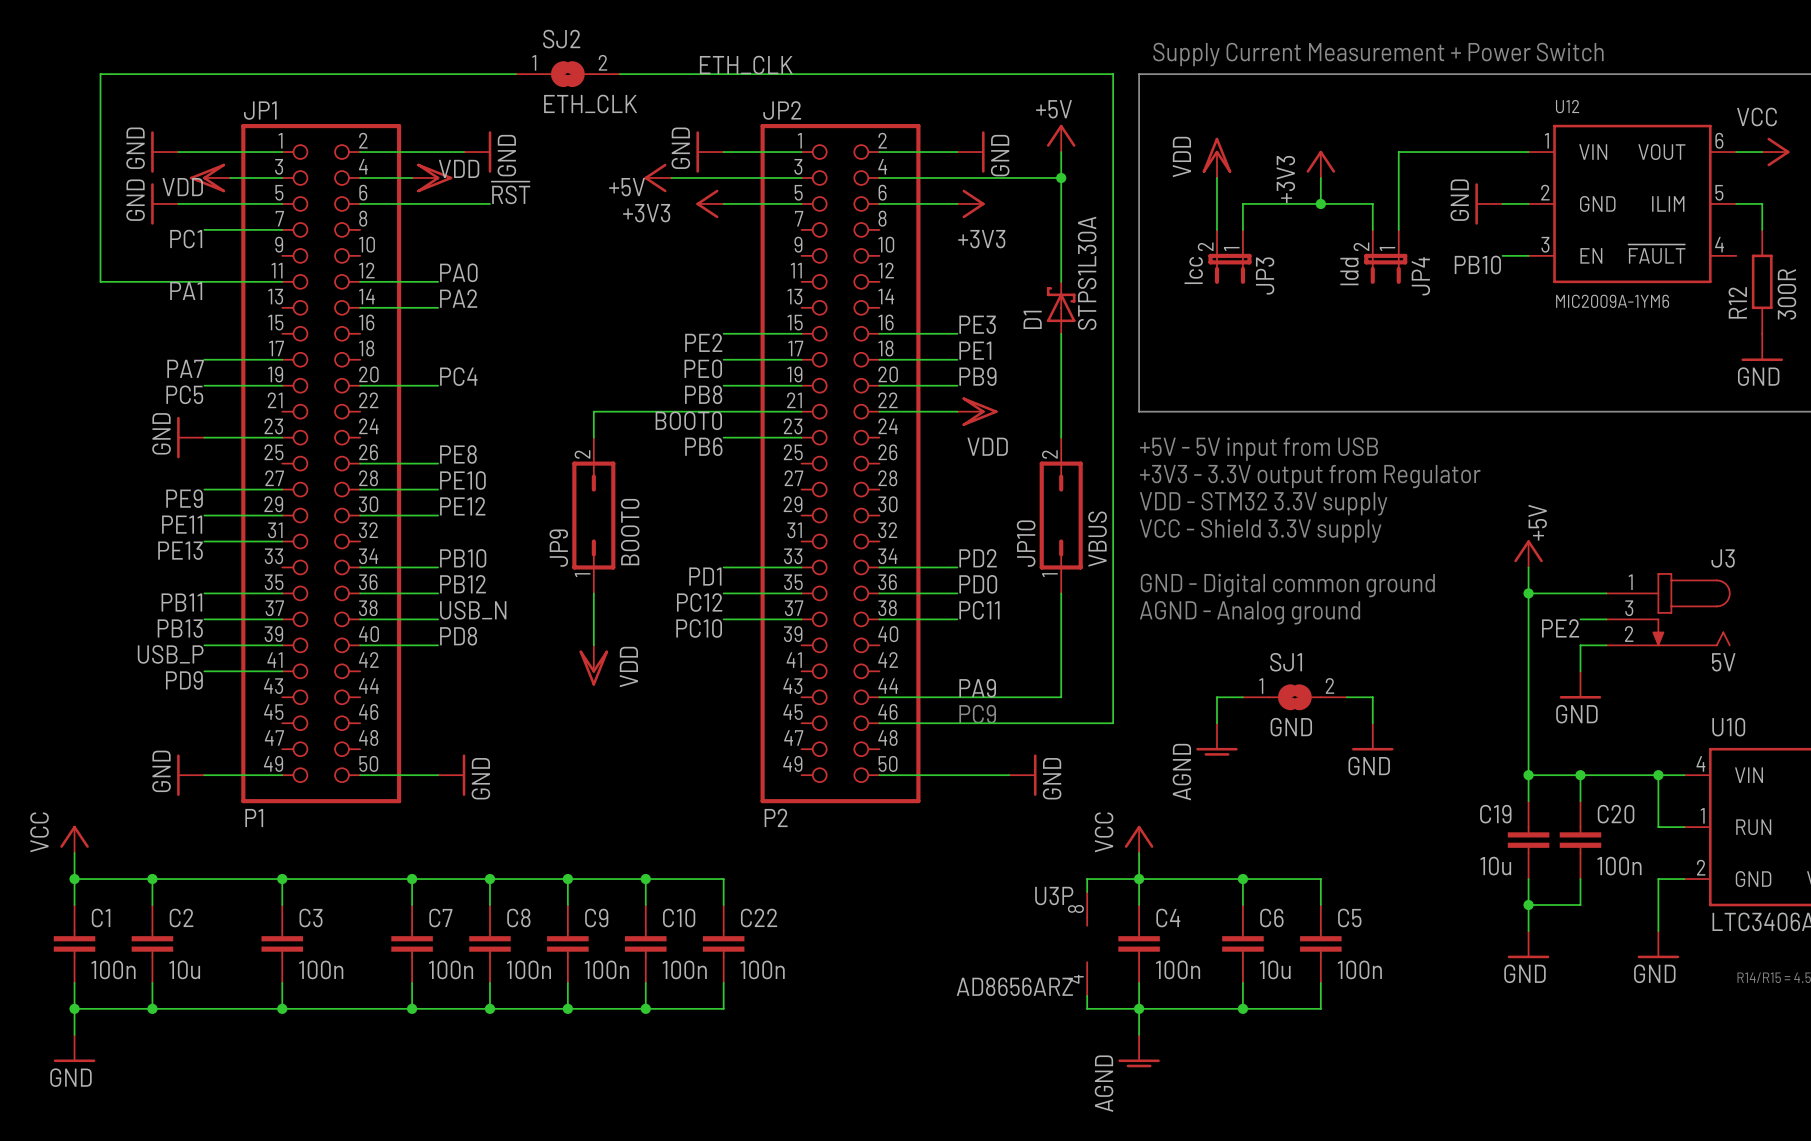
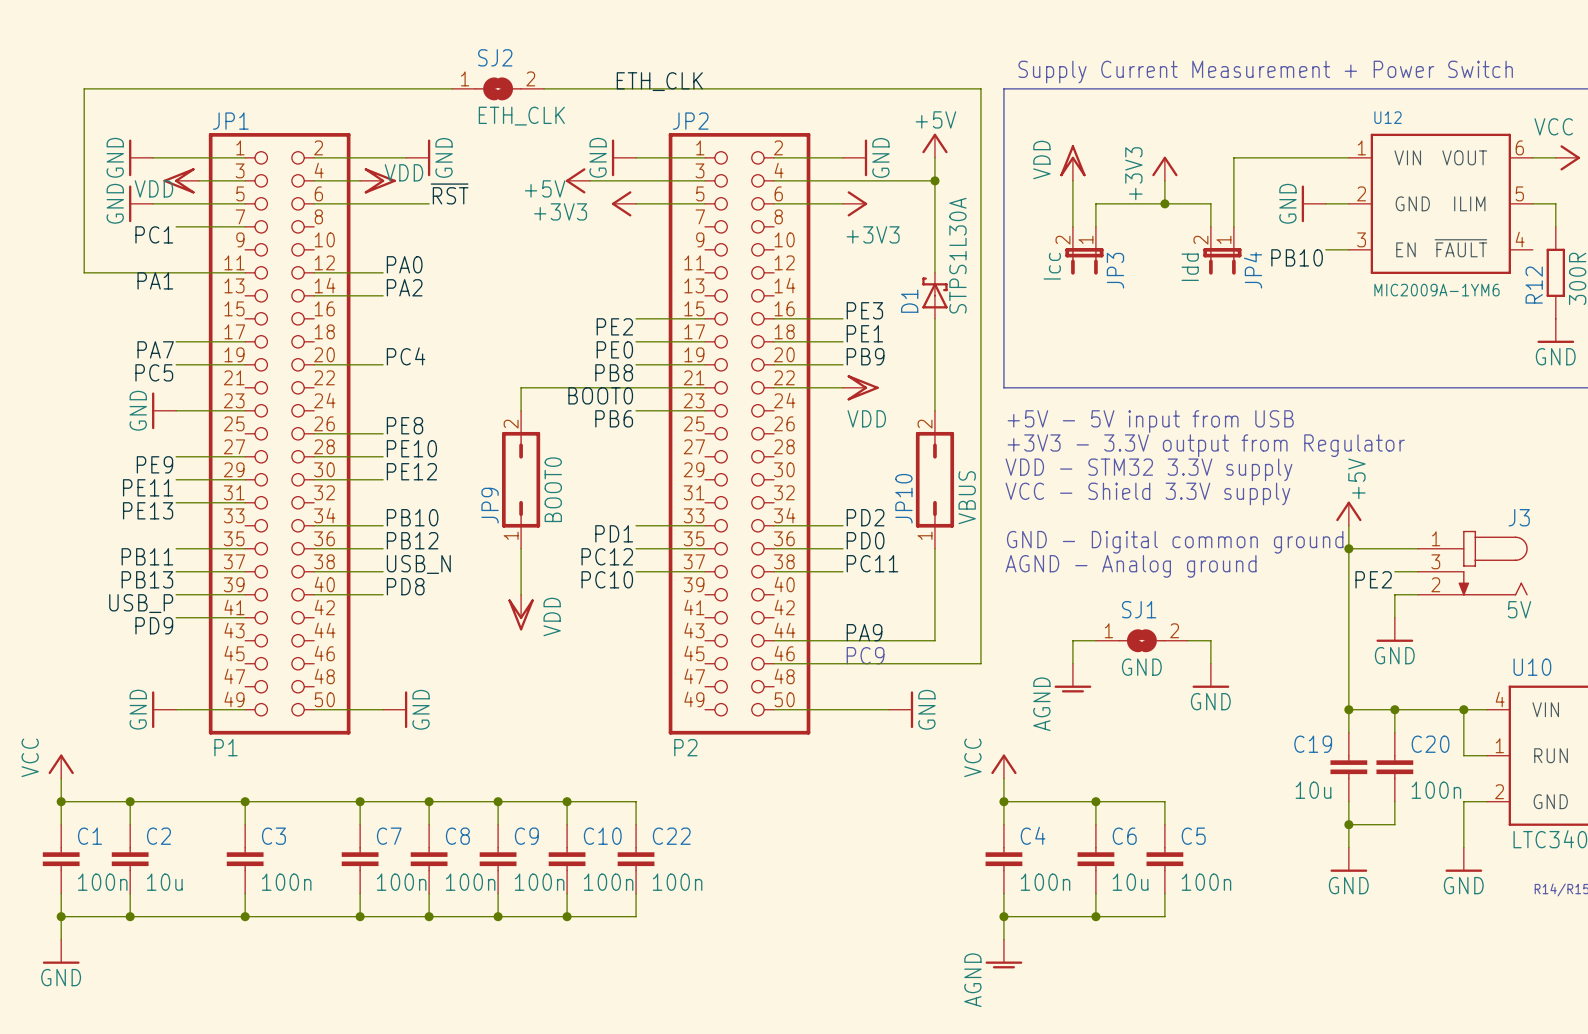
wire: (1139, 879) (1087, 879) (1087, 892) -> none
U3P: AD8656ARZ (1087, 943) -> none
wire: (1087, 995) (1087, 1008) (1139, 1008) -> none

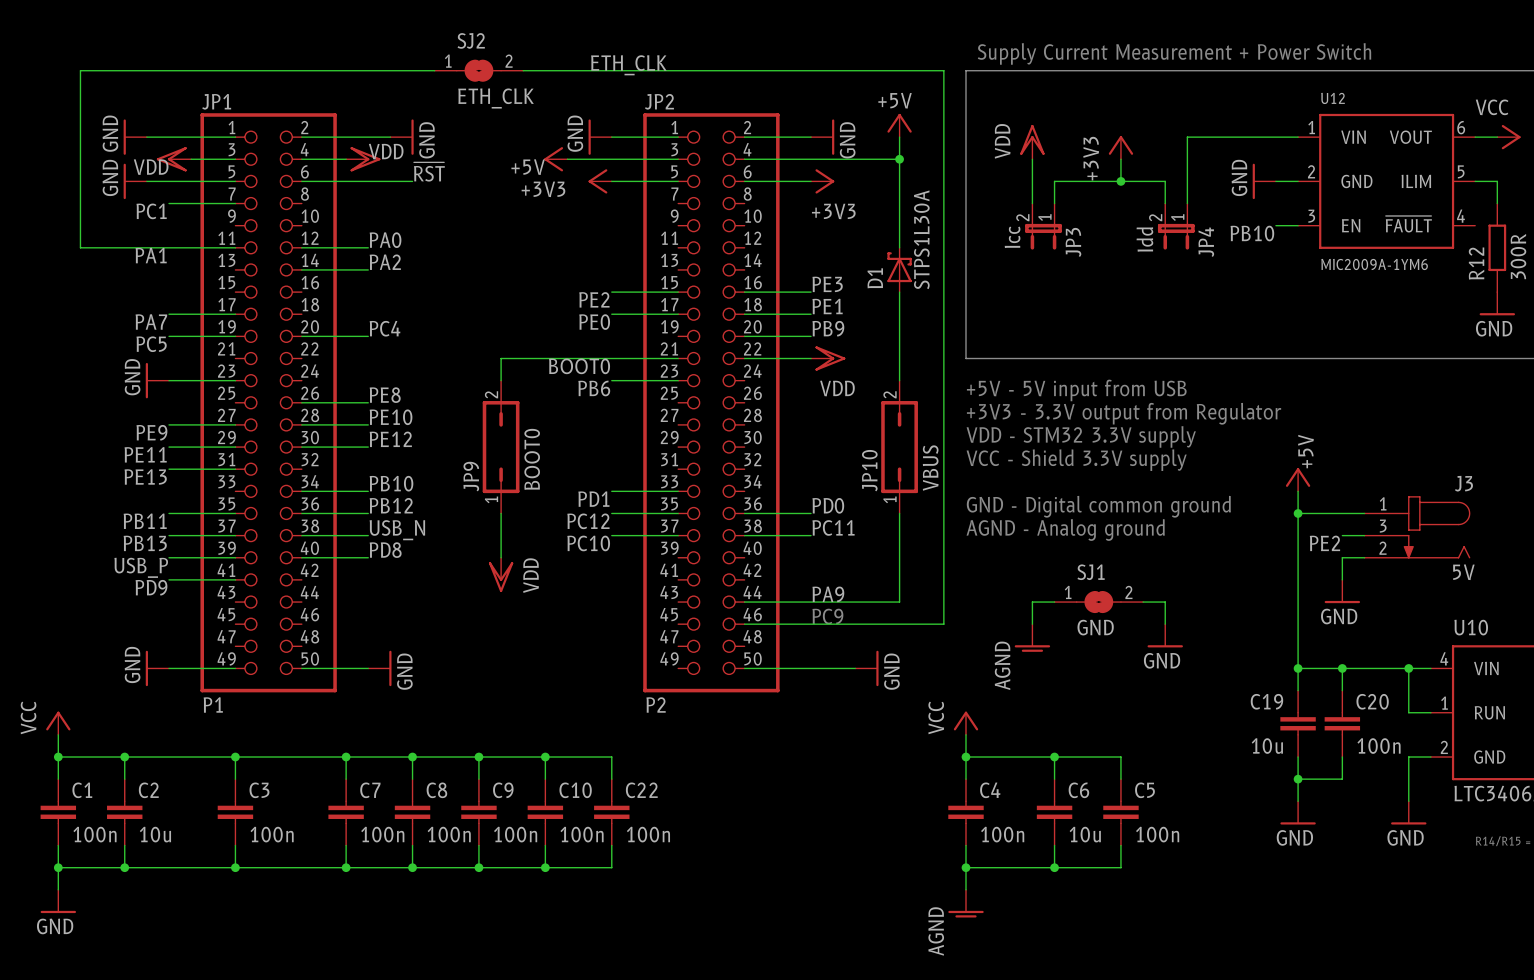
wire: (636, 364) (705, 364) -> none
label: PB8 (614, 372) -> none
label: PD2 (865, 517) -> none
wire: (774, 525) (842, 525) -> none

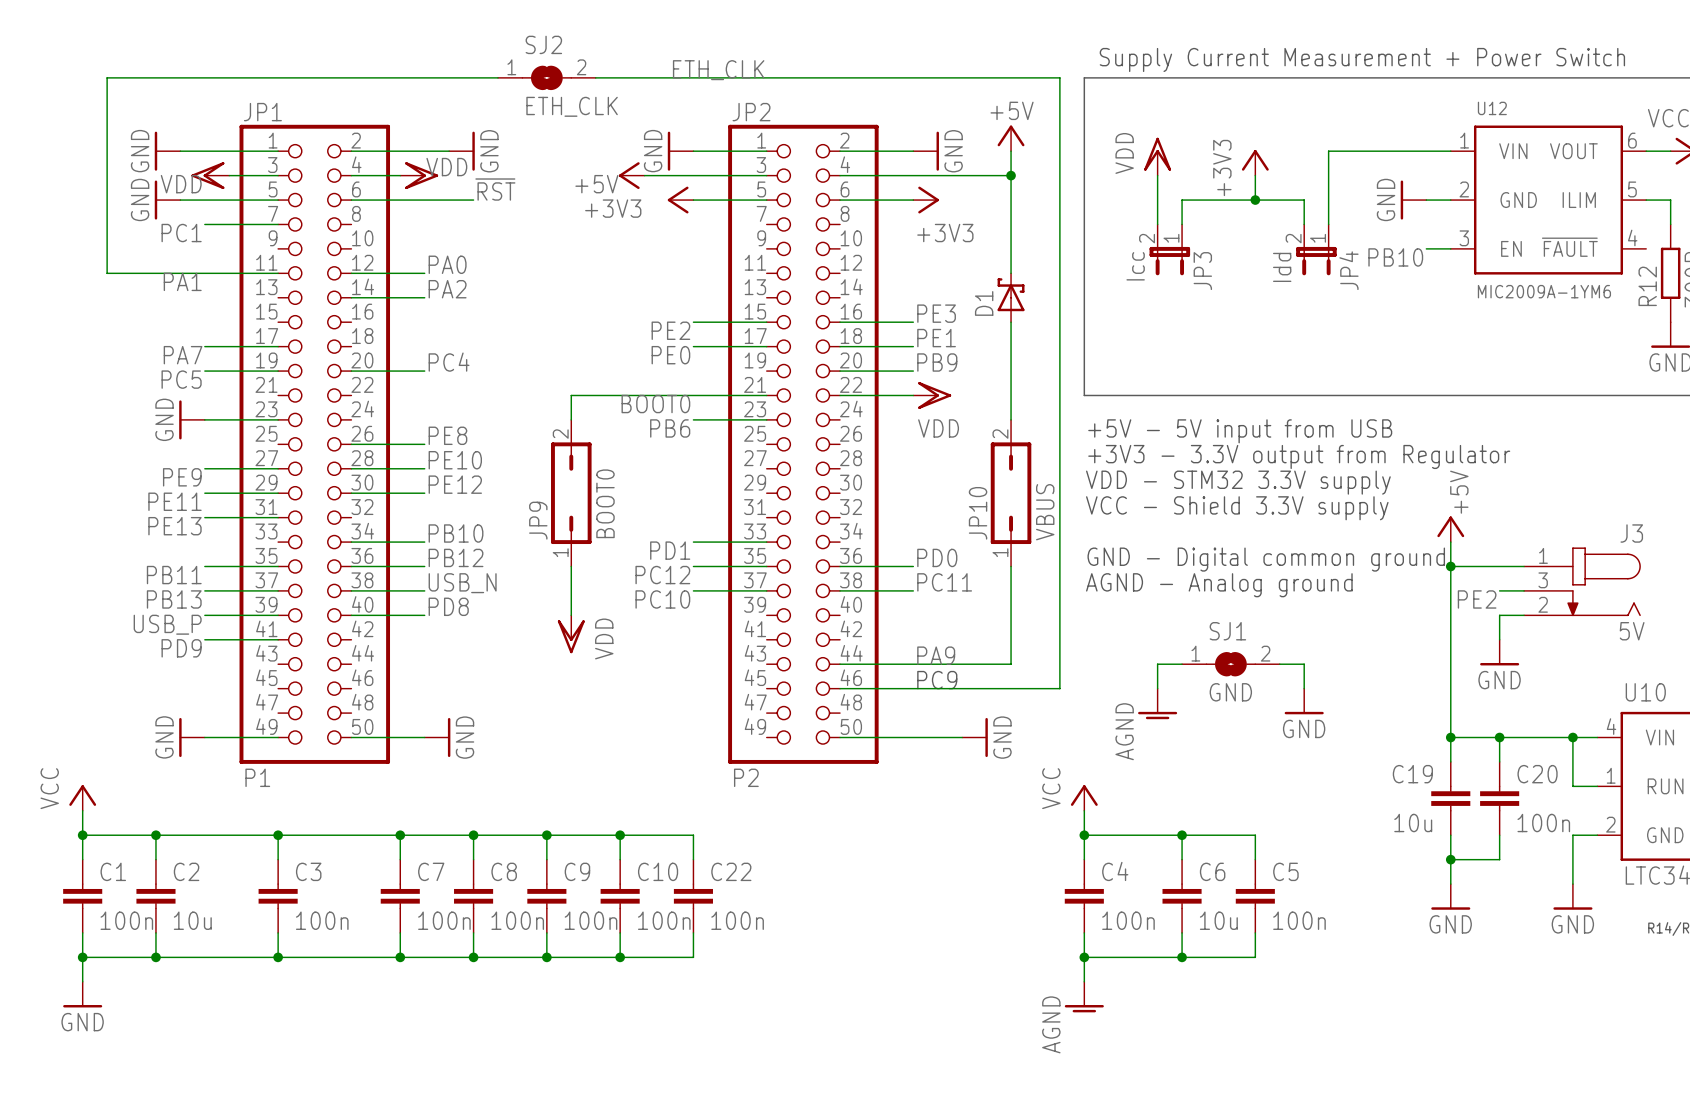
D1 value: STPS1L30A (921, 239) -> none

